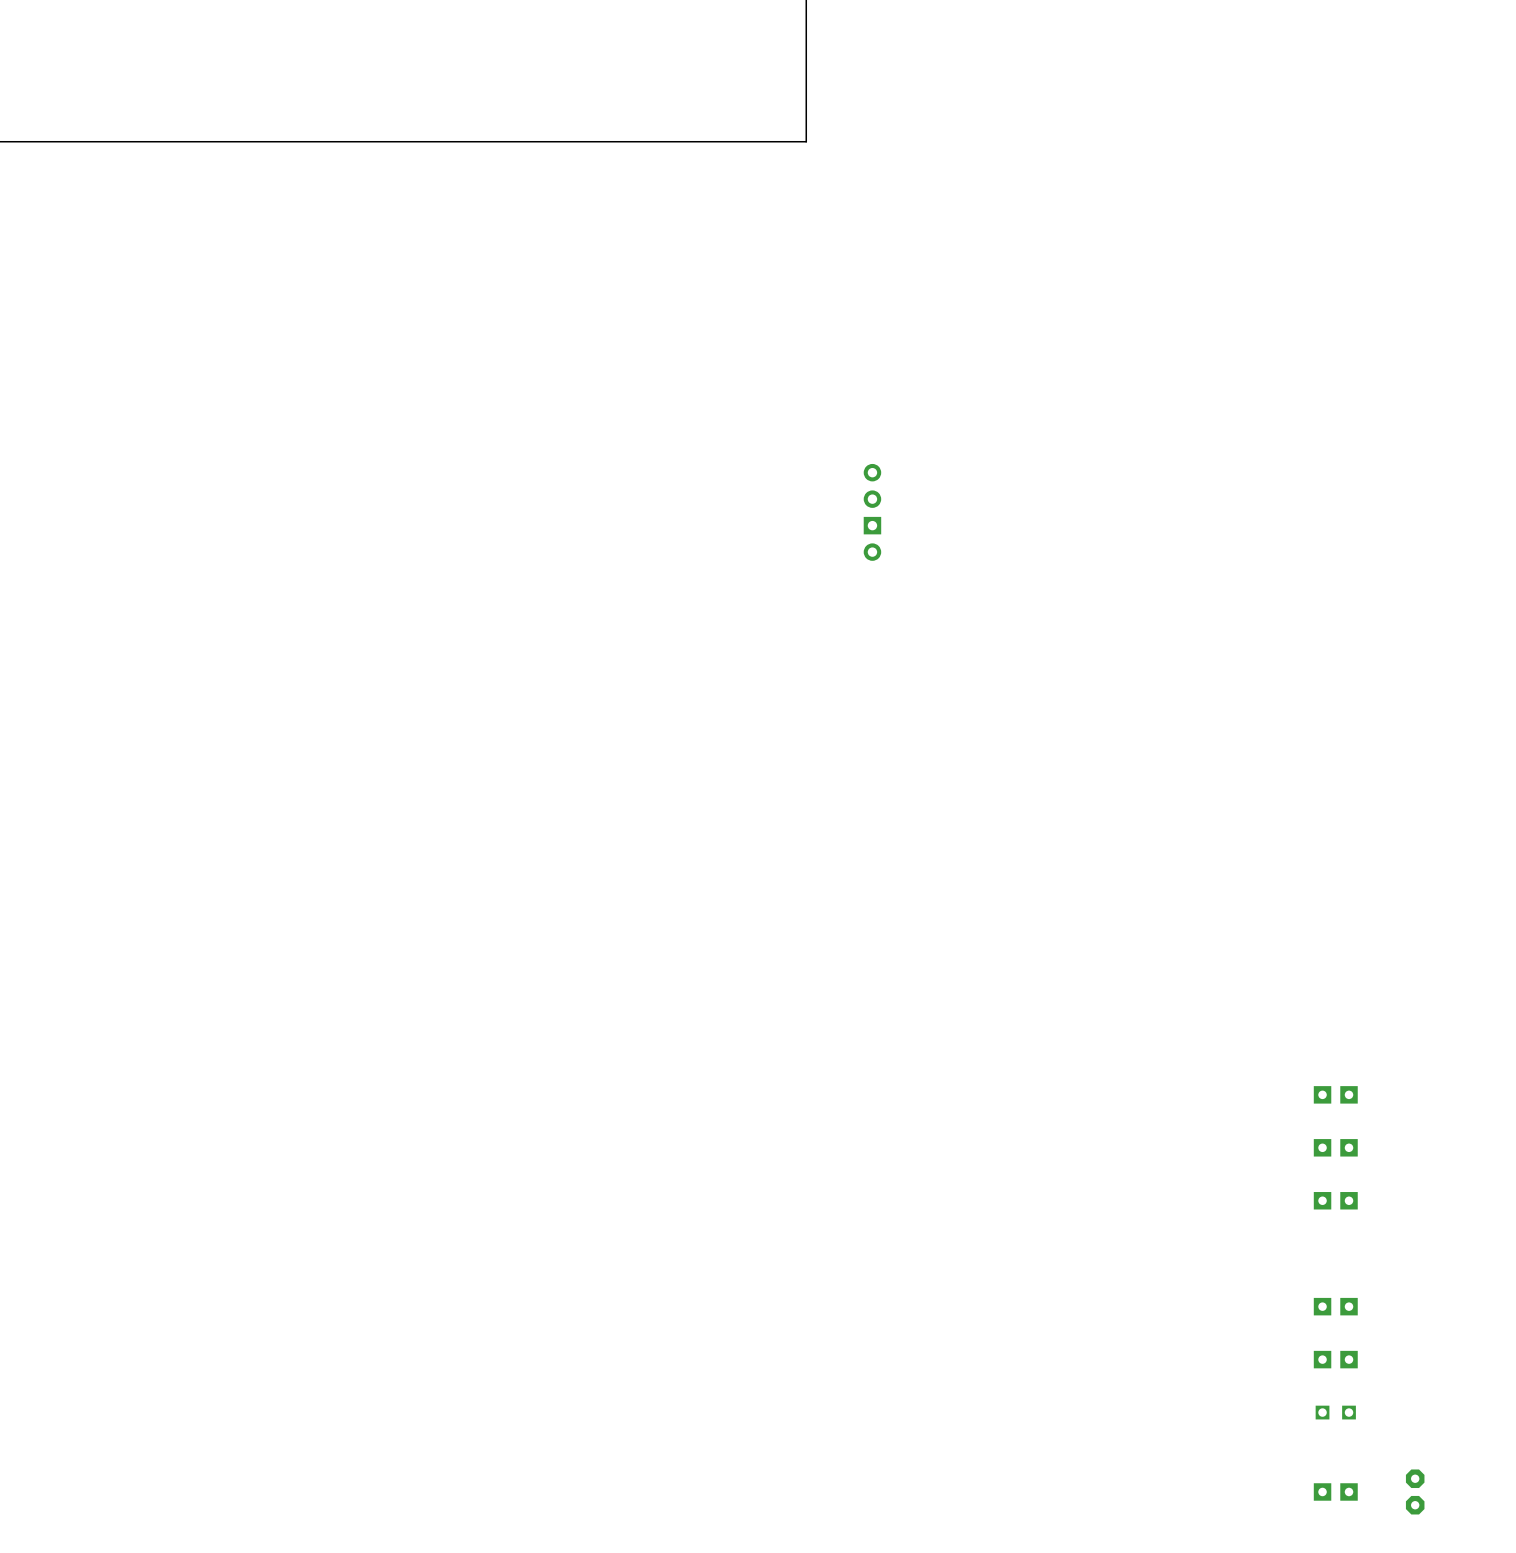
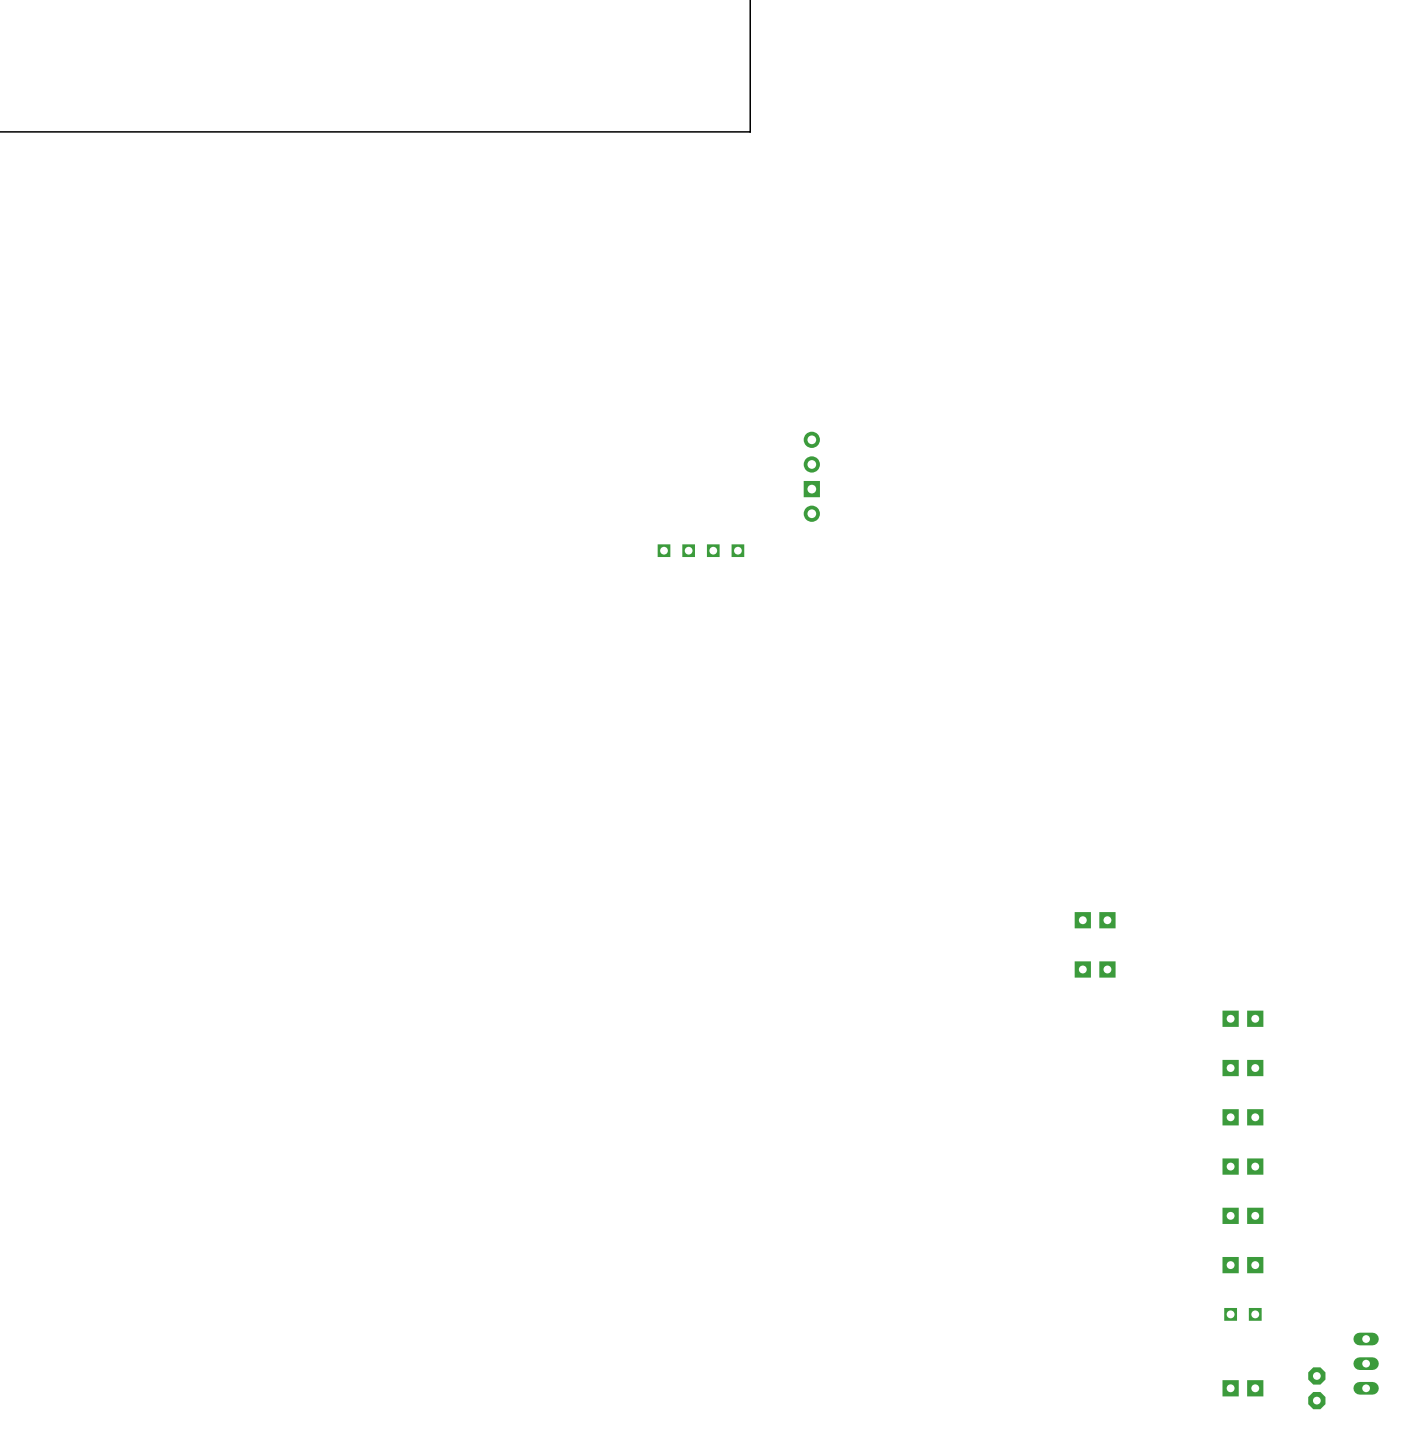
part: none -> (700, 550)
part: none -> (1095, 920)
part: none -> (1095, 969)
part: none -> (1242, 1166)
part: none -> (1366, 1363)

